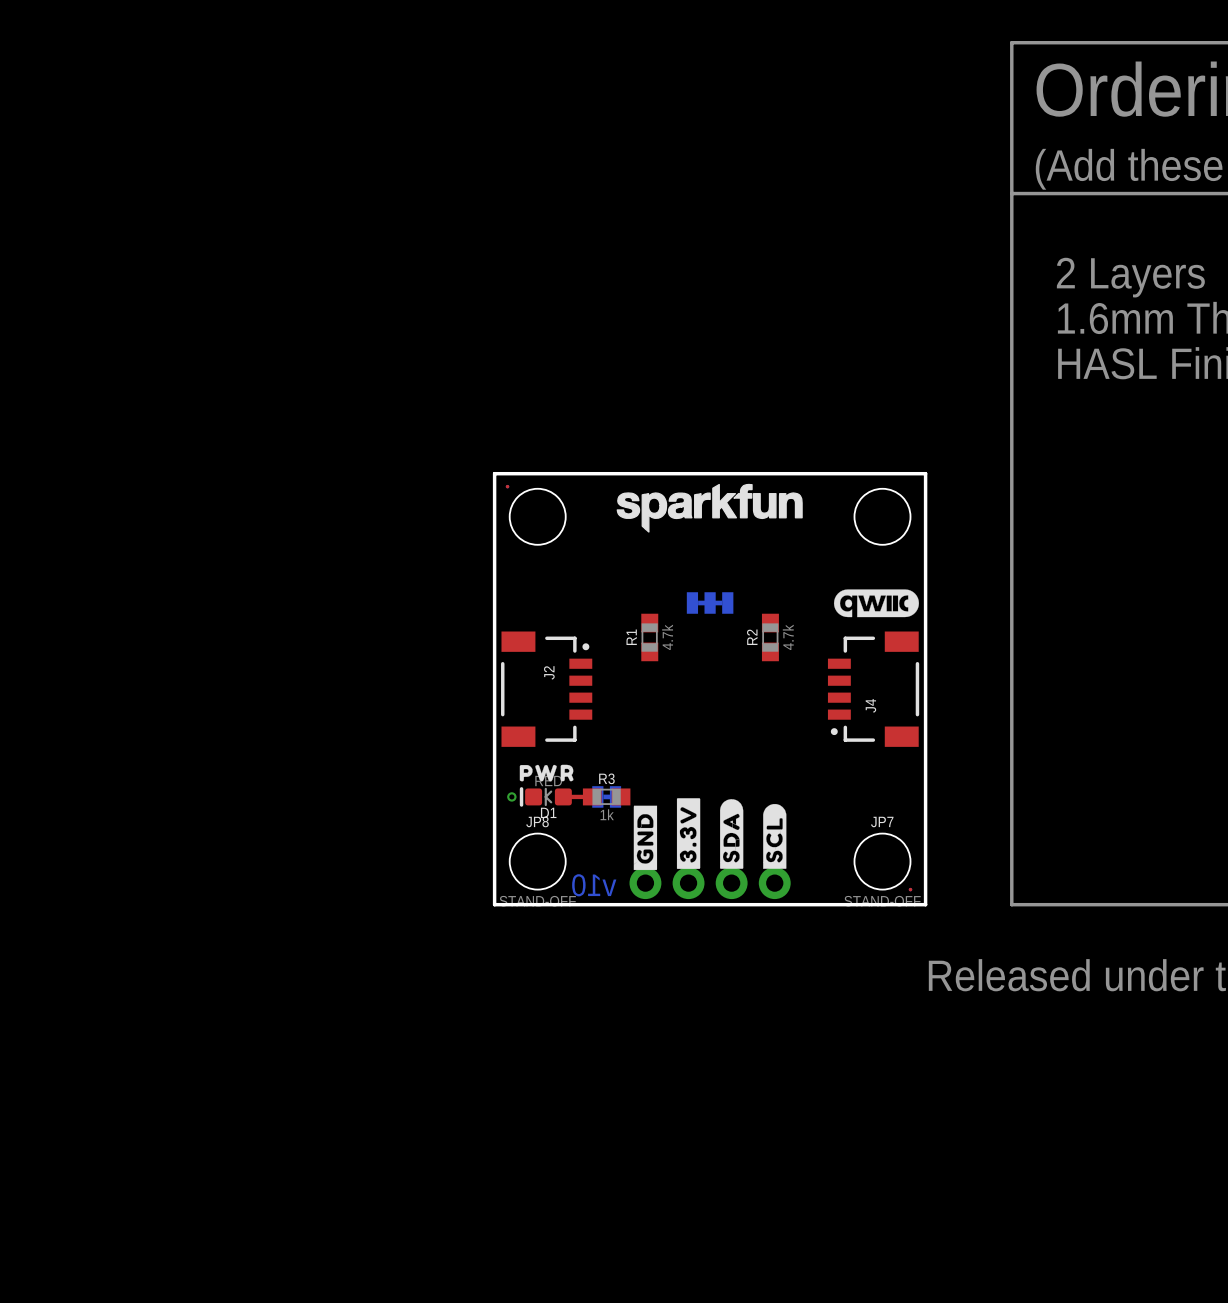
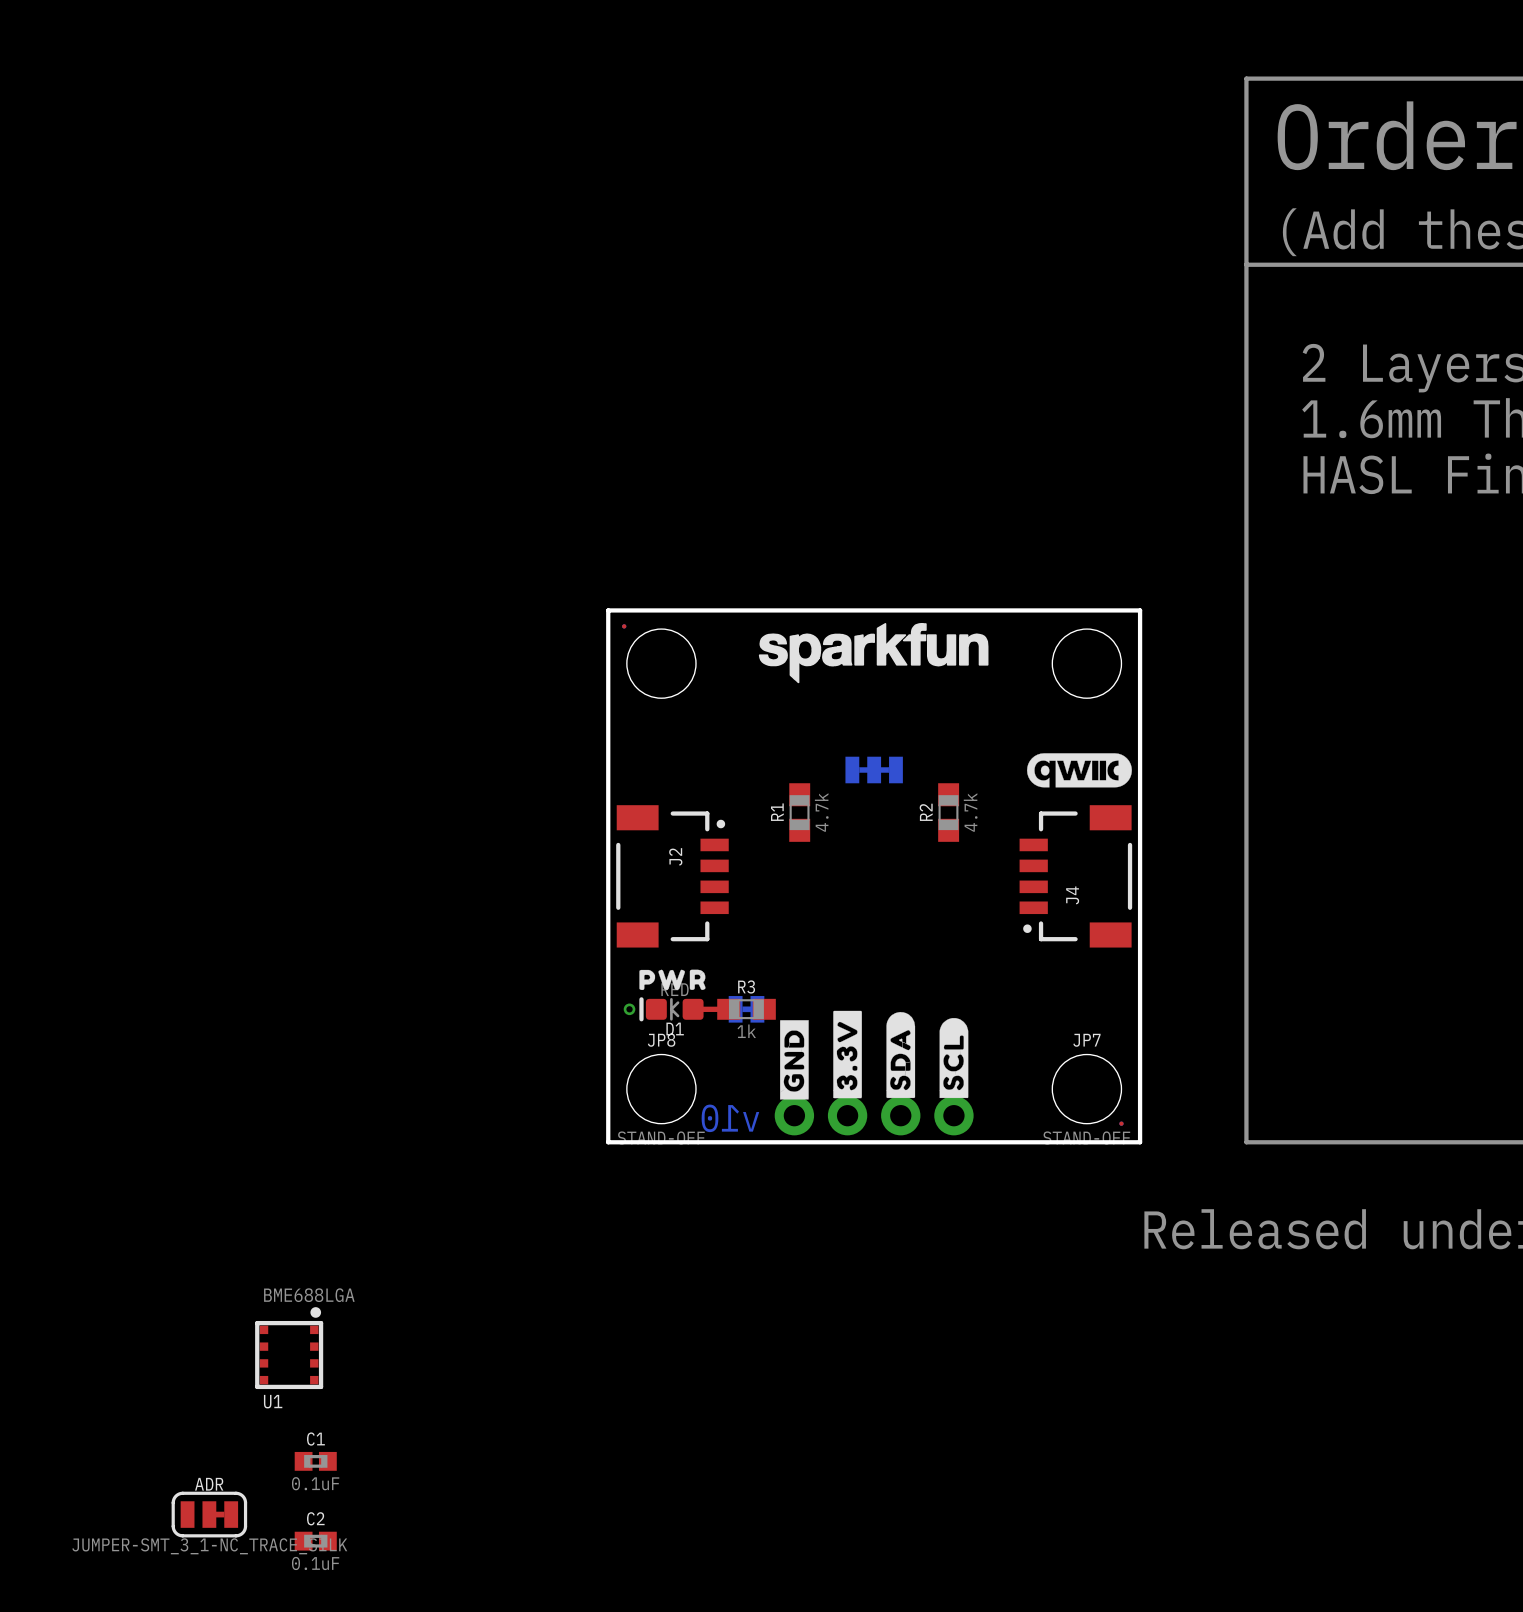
U1: none -> BME688LGA (289, 1348)
C1: none -> 0.1uF (315, 1461)
ADR: none -> JUMPER-SMT_3_1-NC_TRACE_SILK (209, 1514)
C2: none -> 0.1uF (315, 1541)

